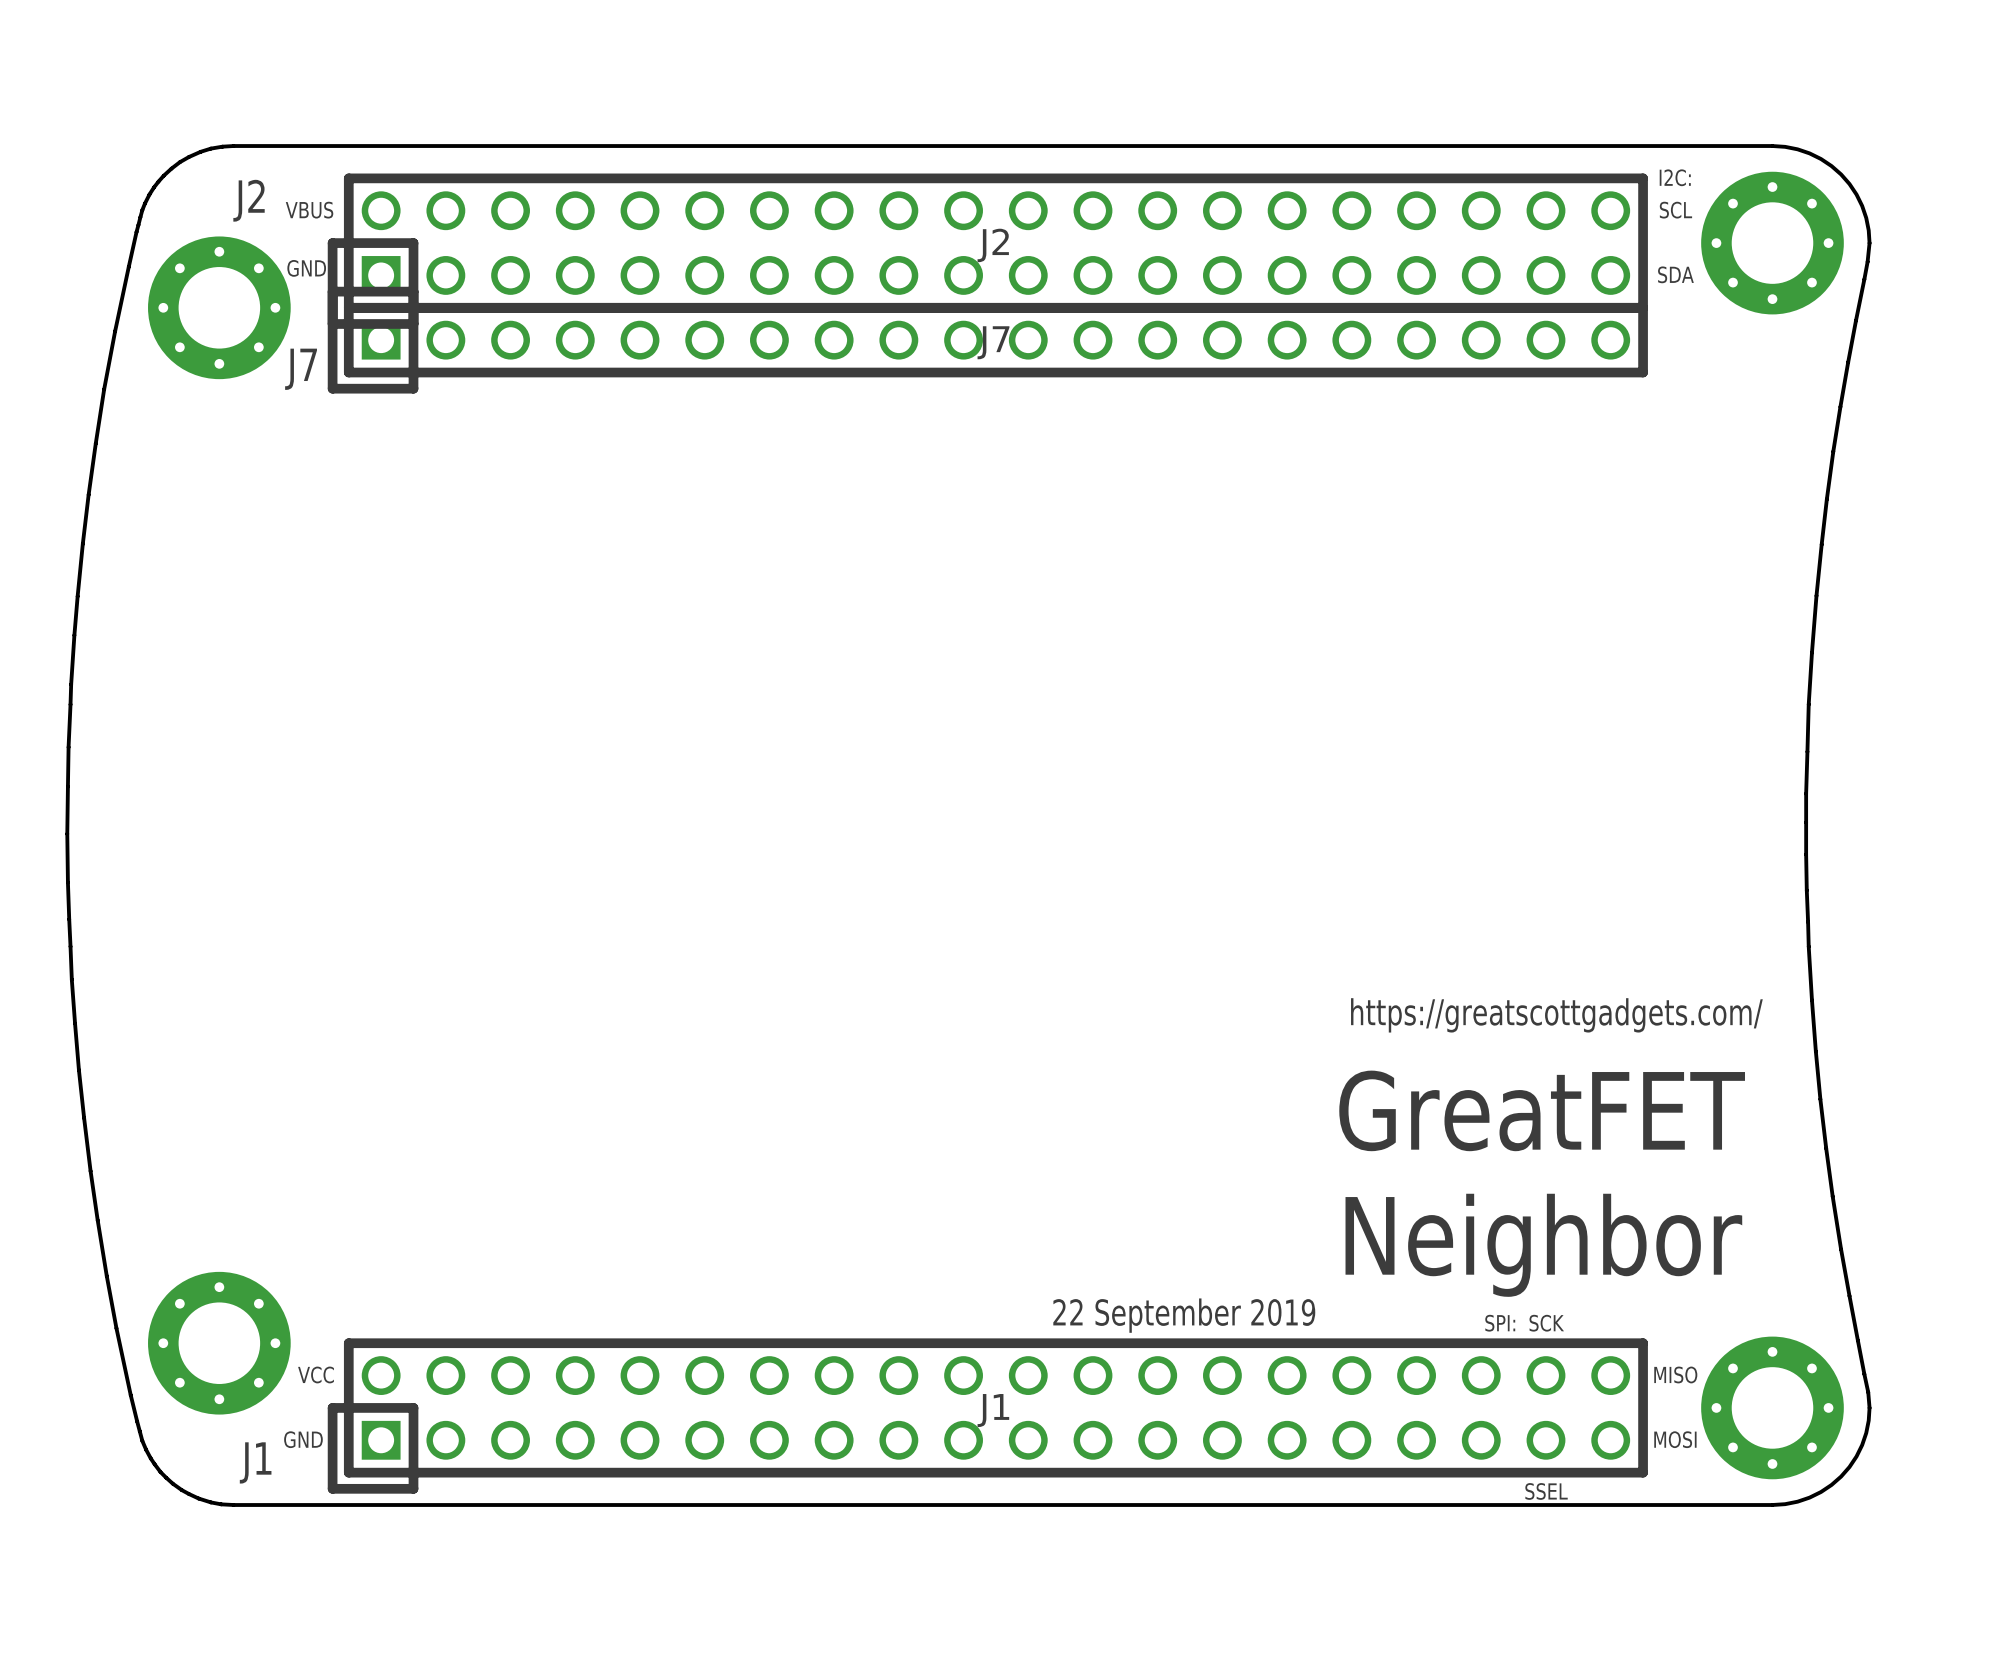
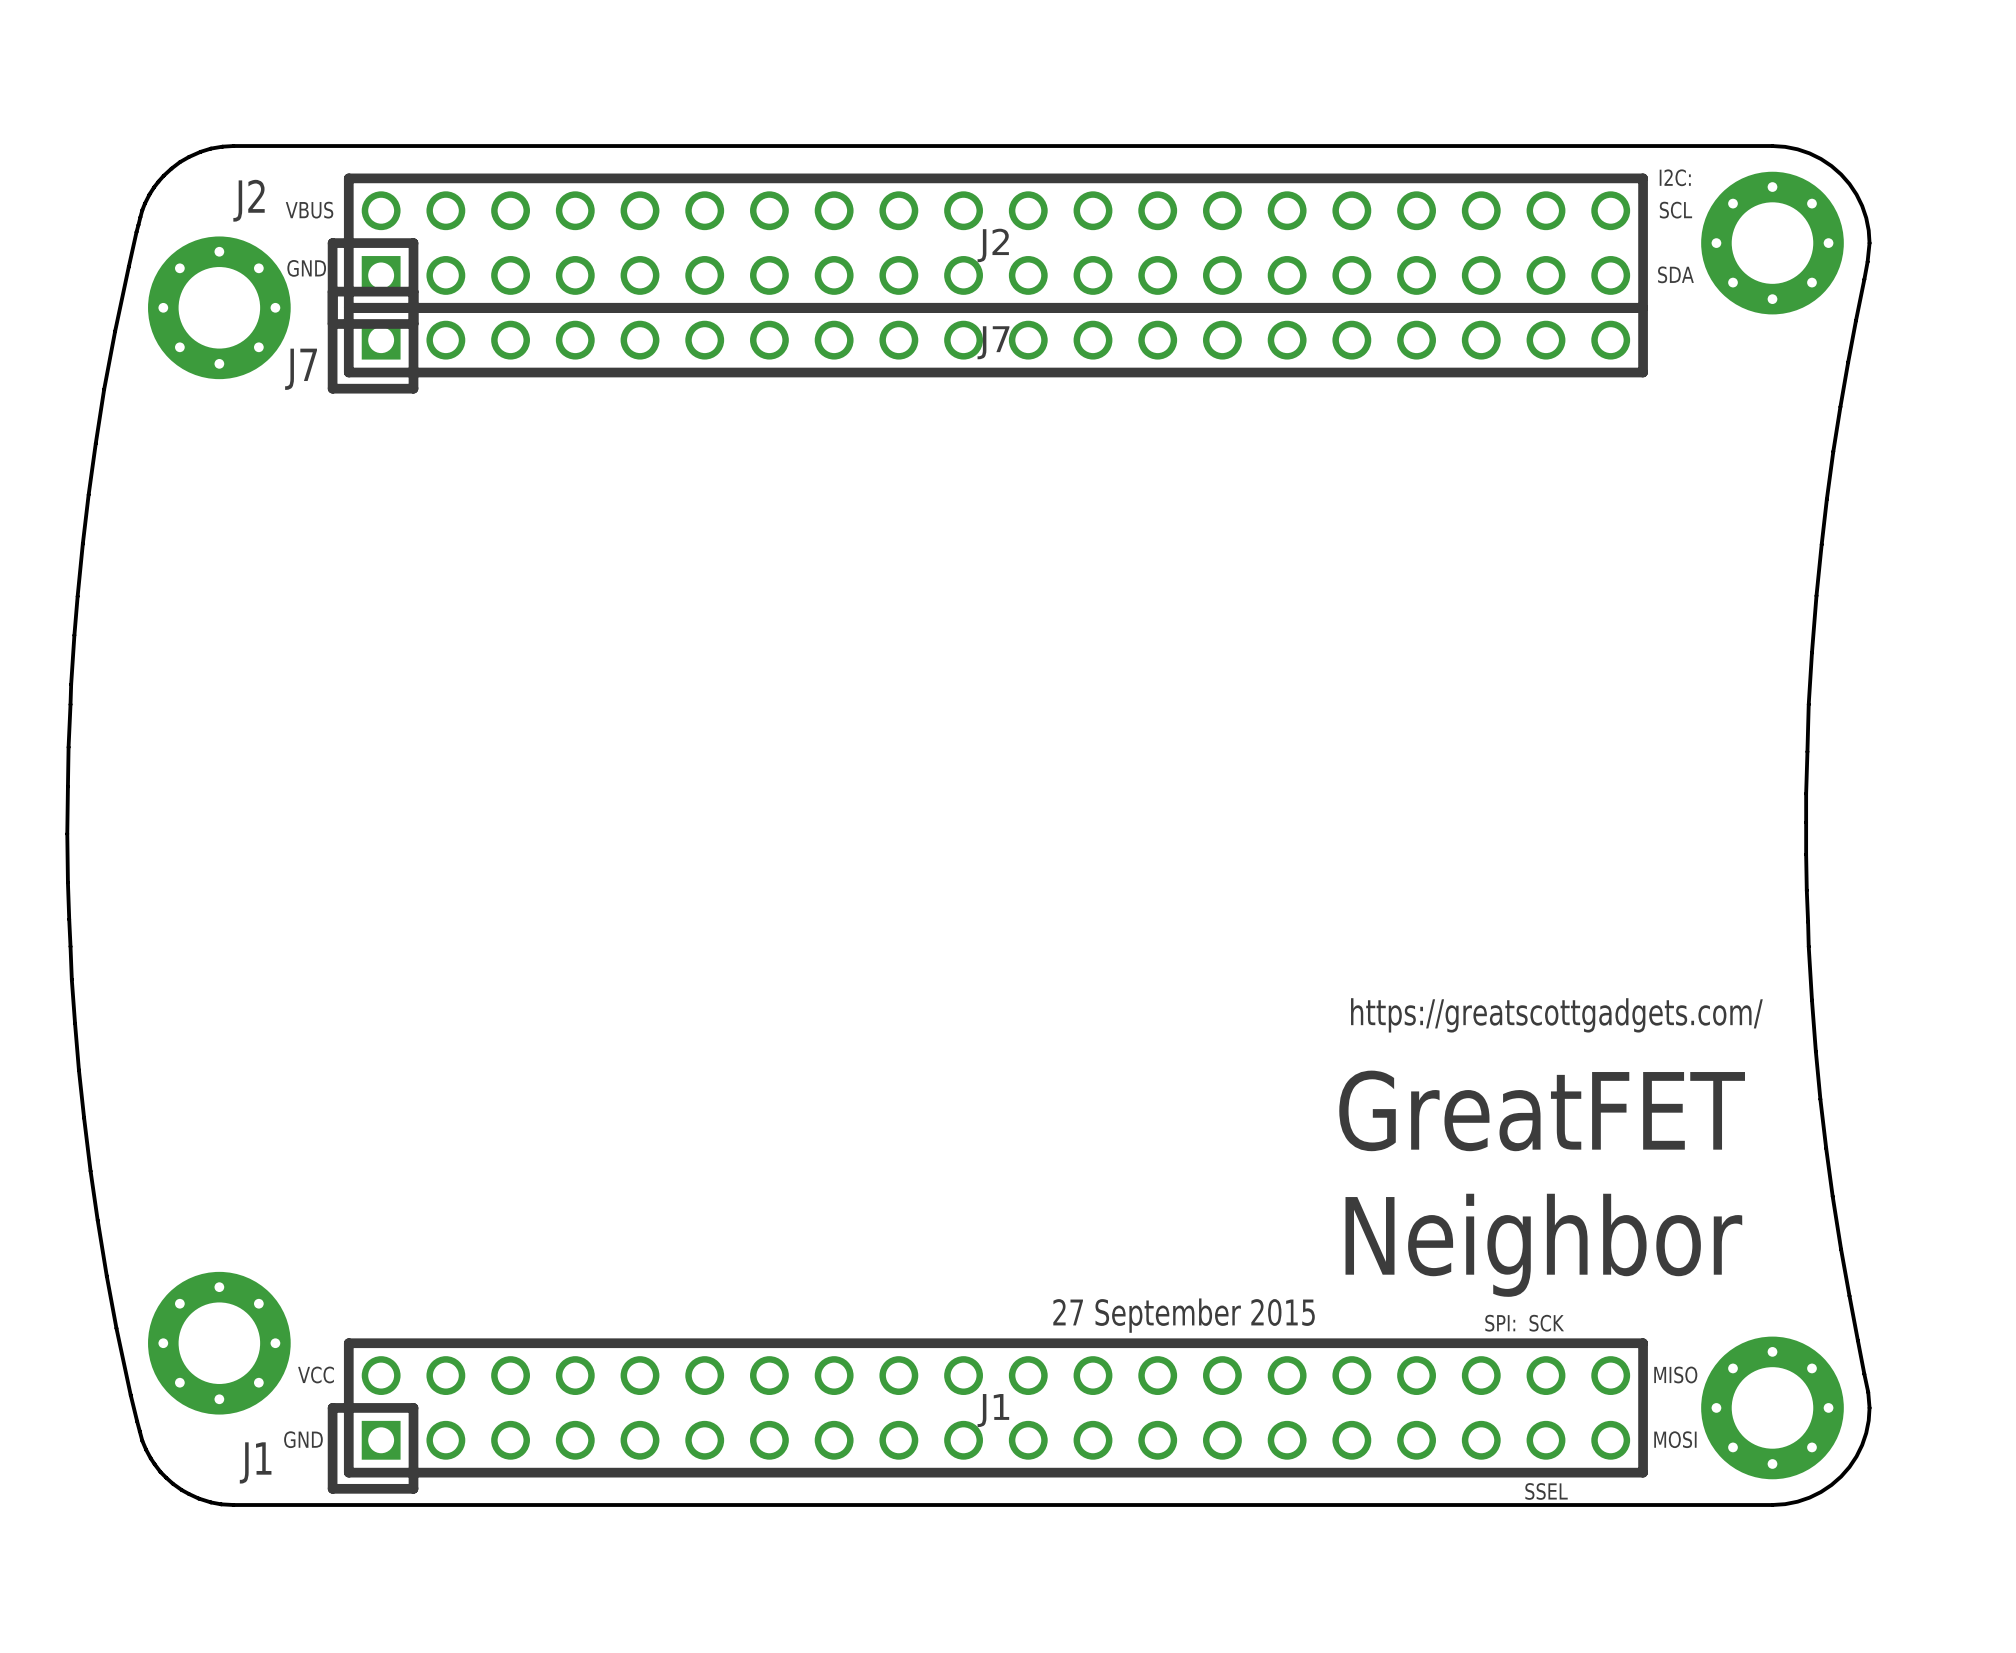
text: 22 September 2019 (1184, 1315) -> 27 September 2015 (1184, 1315)

